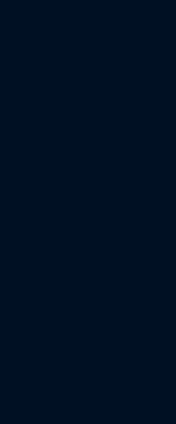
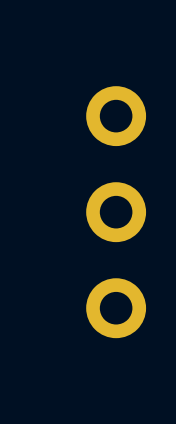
part: none -> (116, 116)
part: none -> (116, 212)
part: none -> (116, 308)

